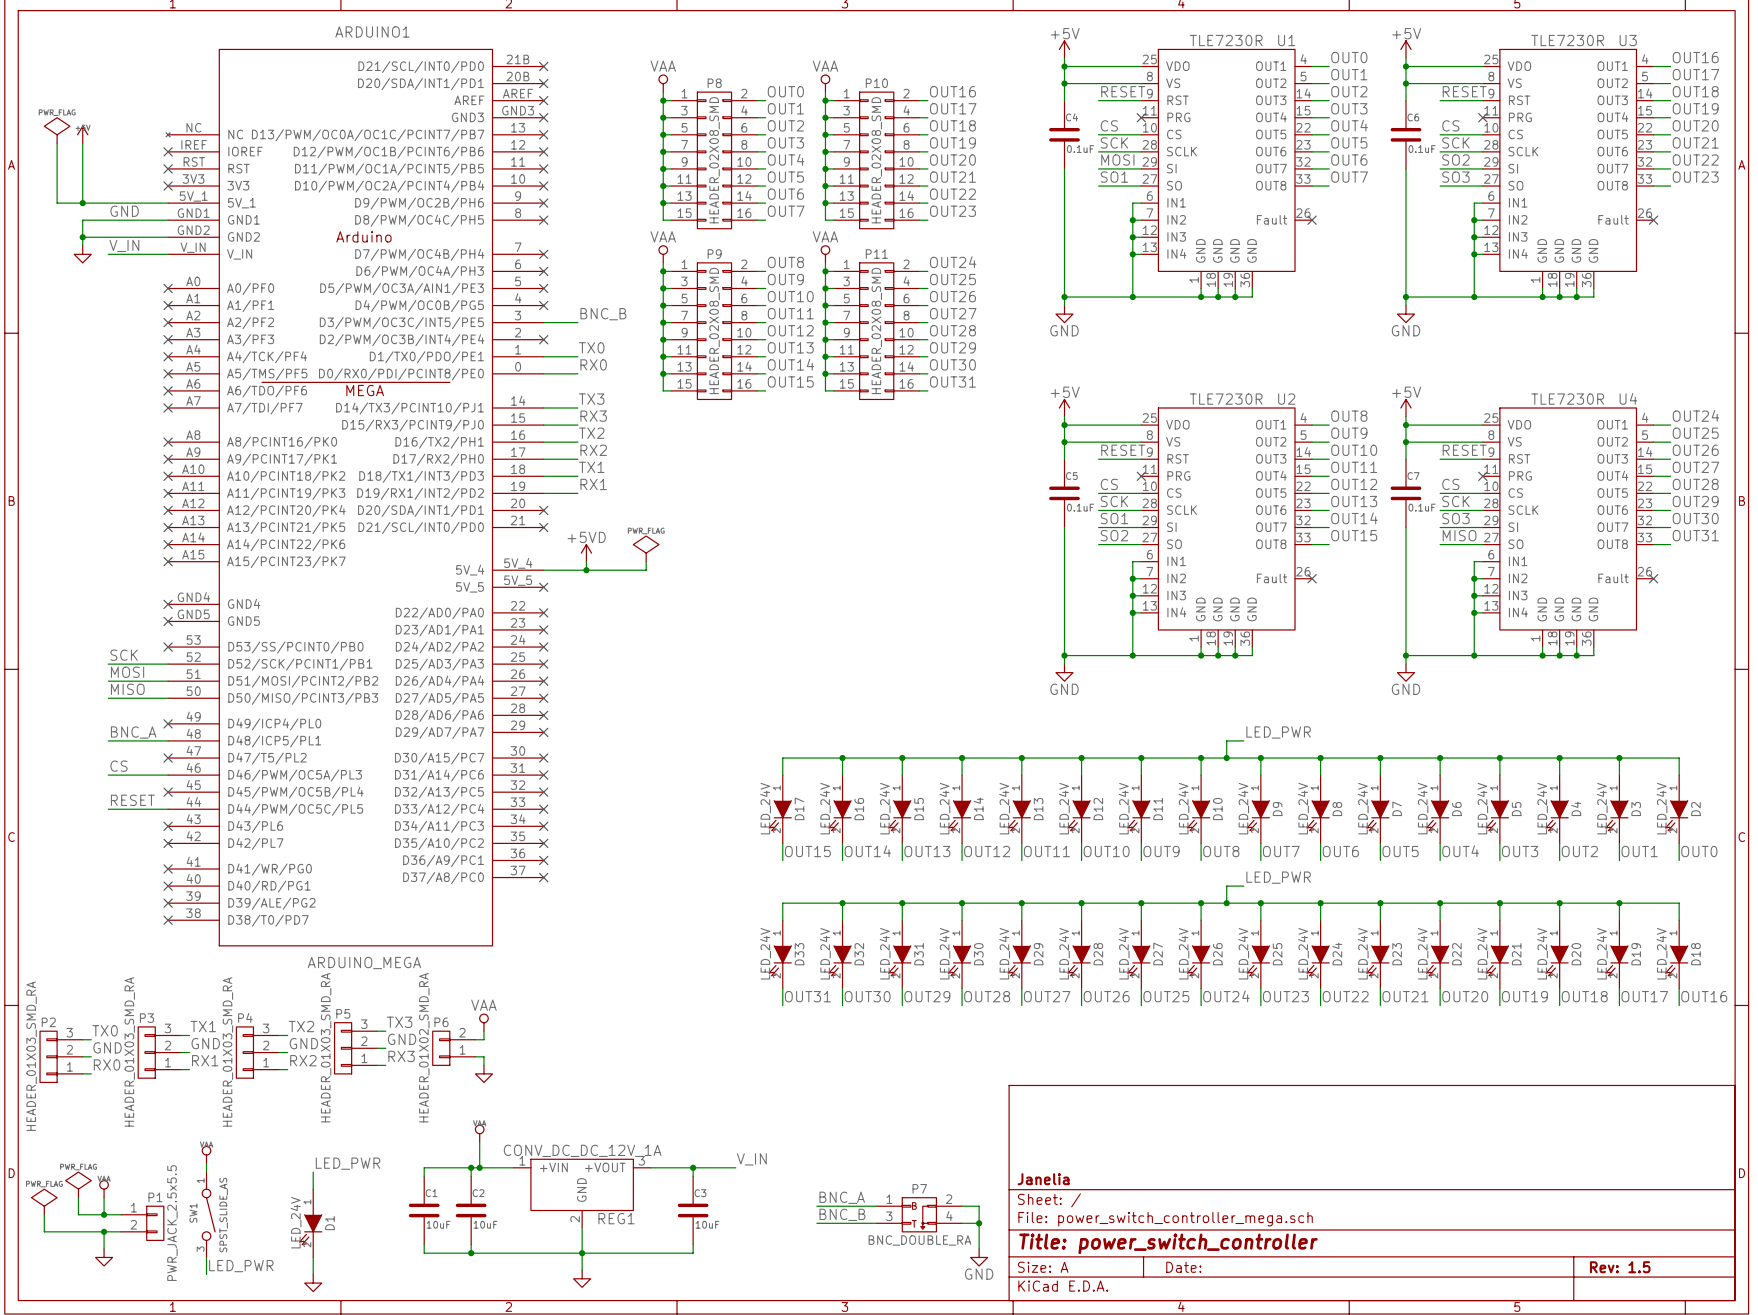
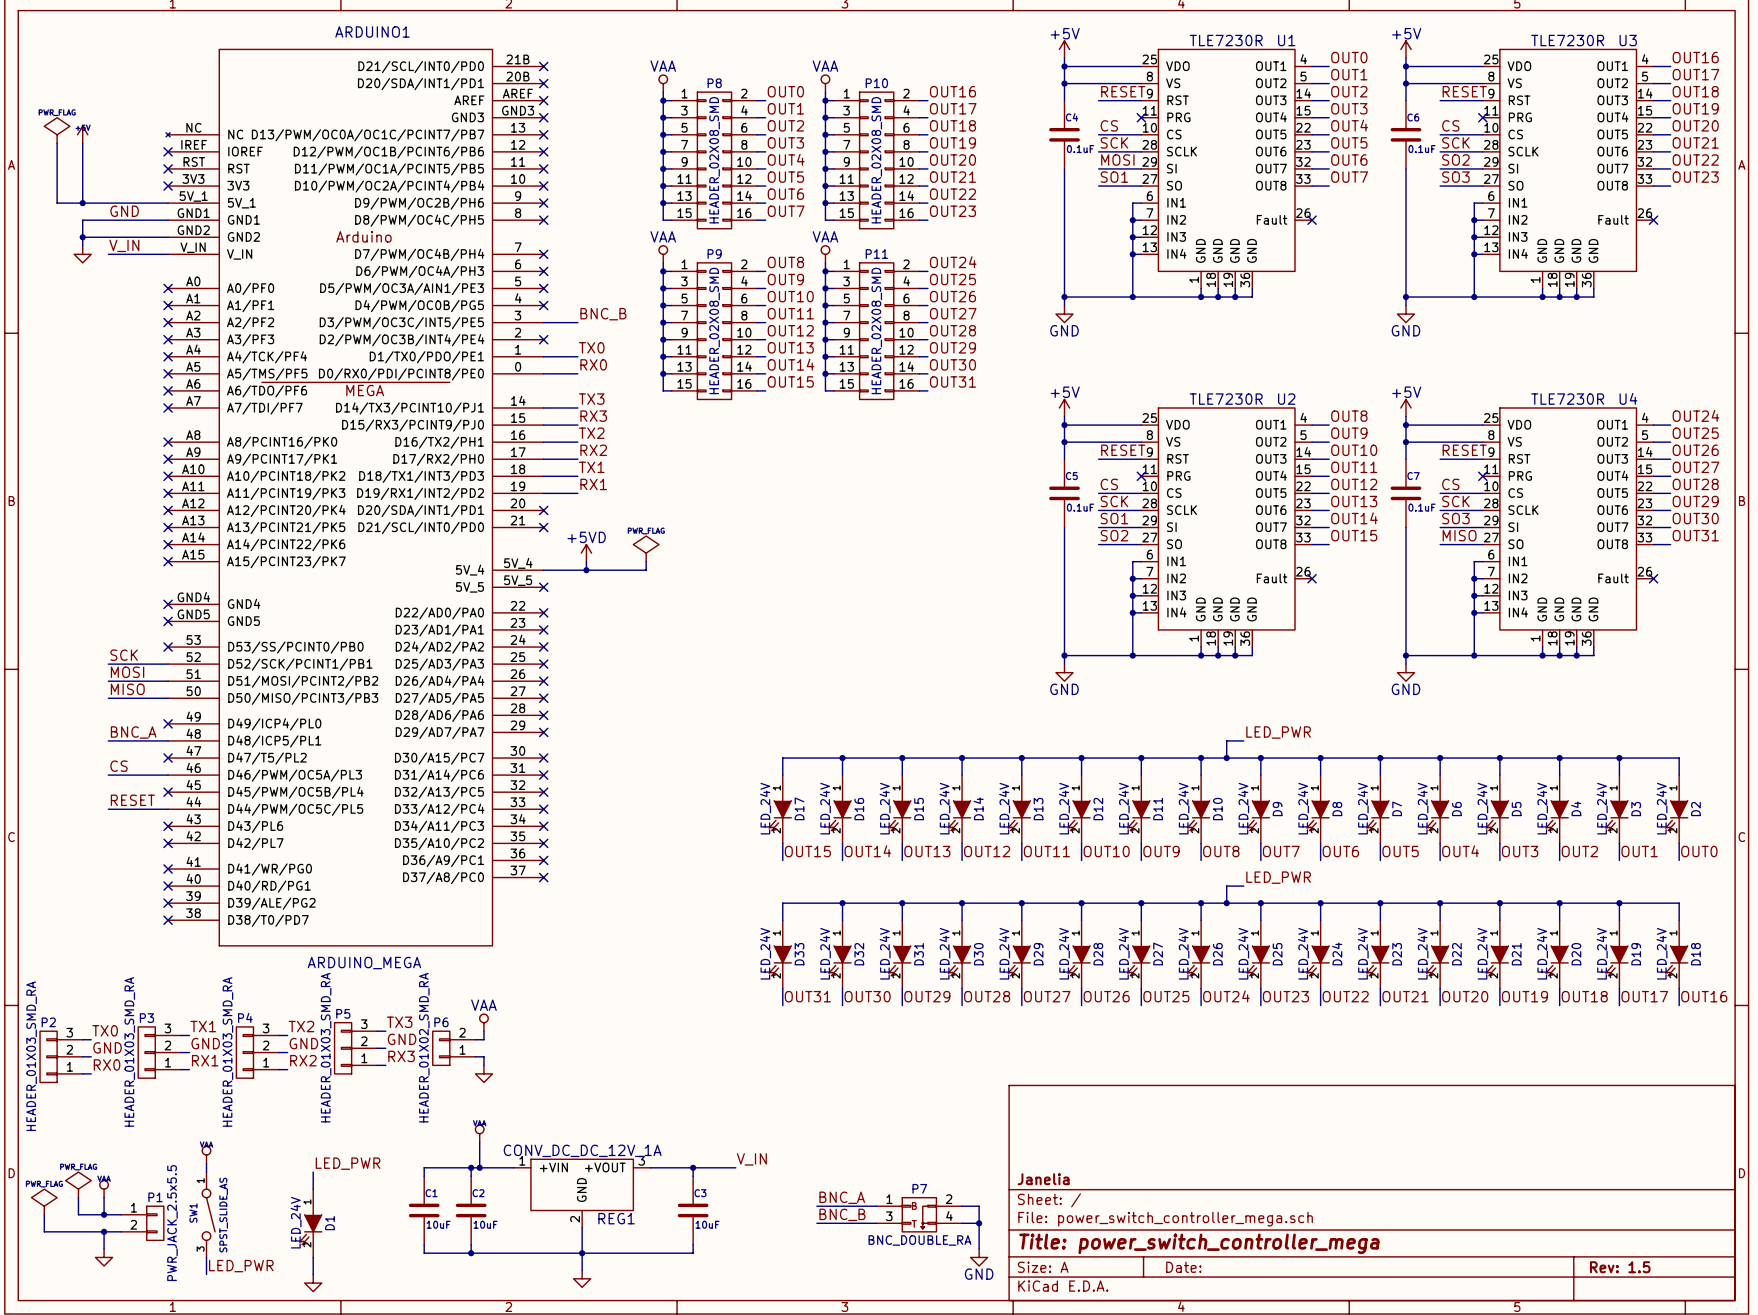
title block: Title: power_switch_controller (1168, 1243) -> Title: power_switch_controller_mega (1199, 1243)

